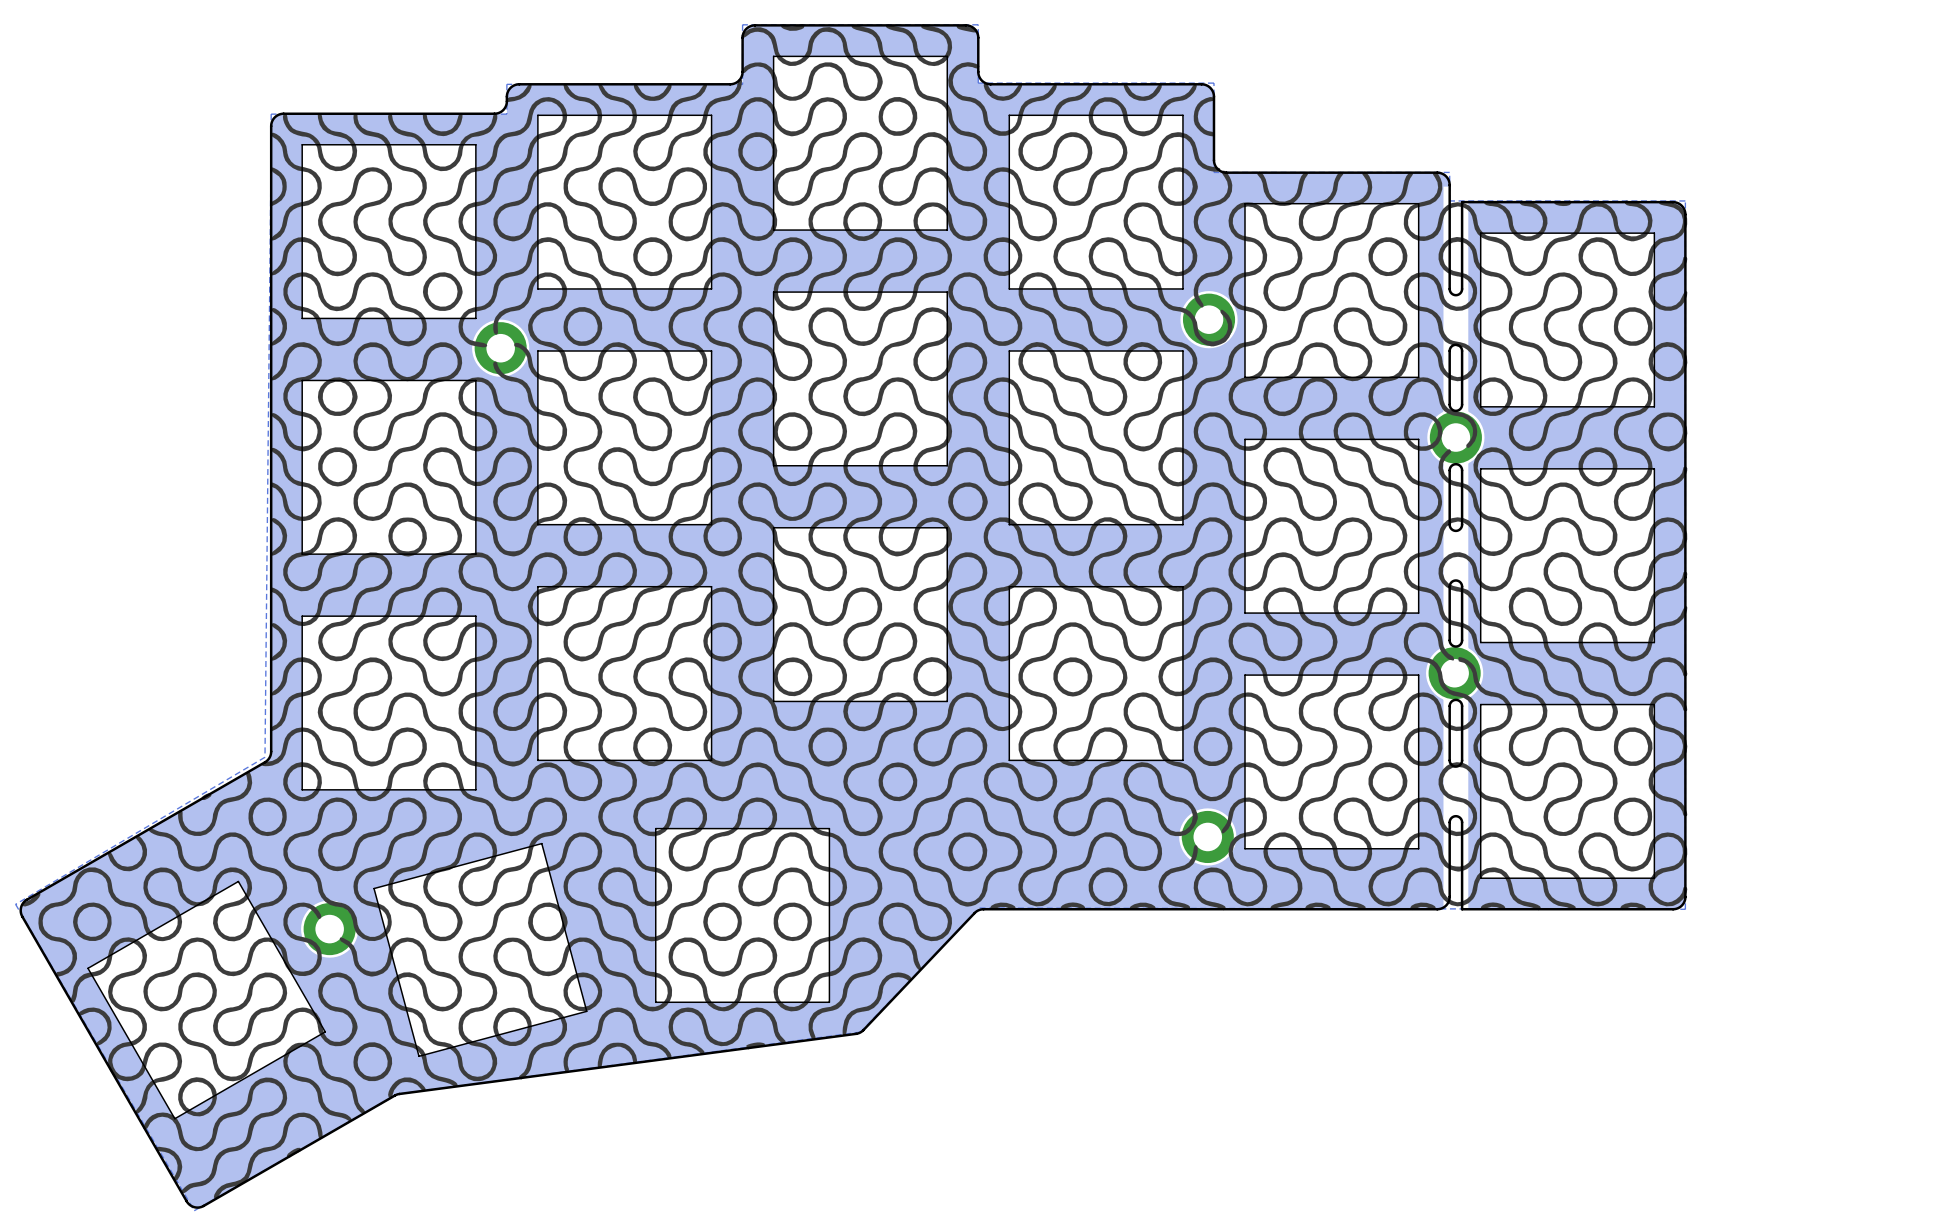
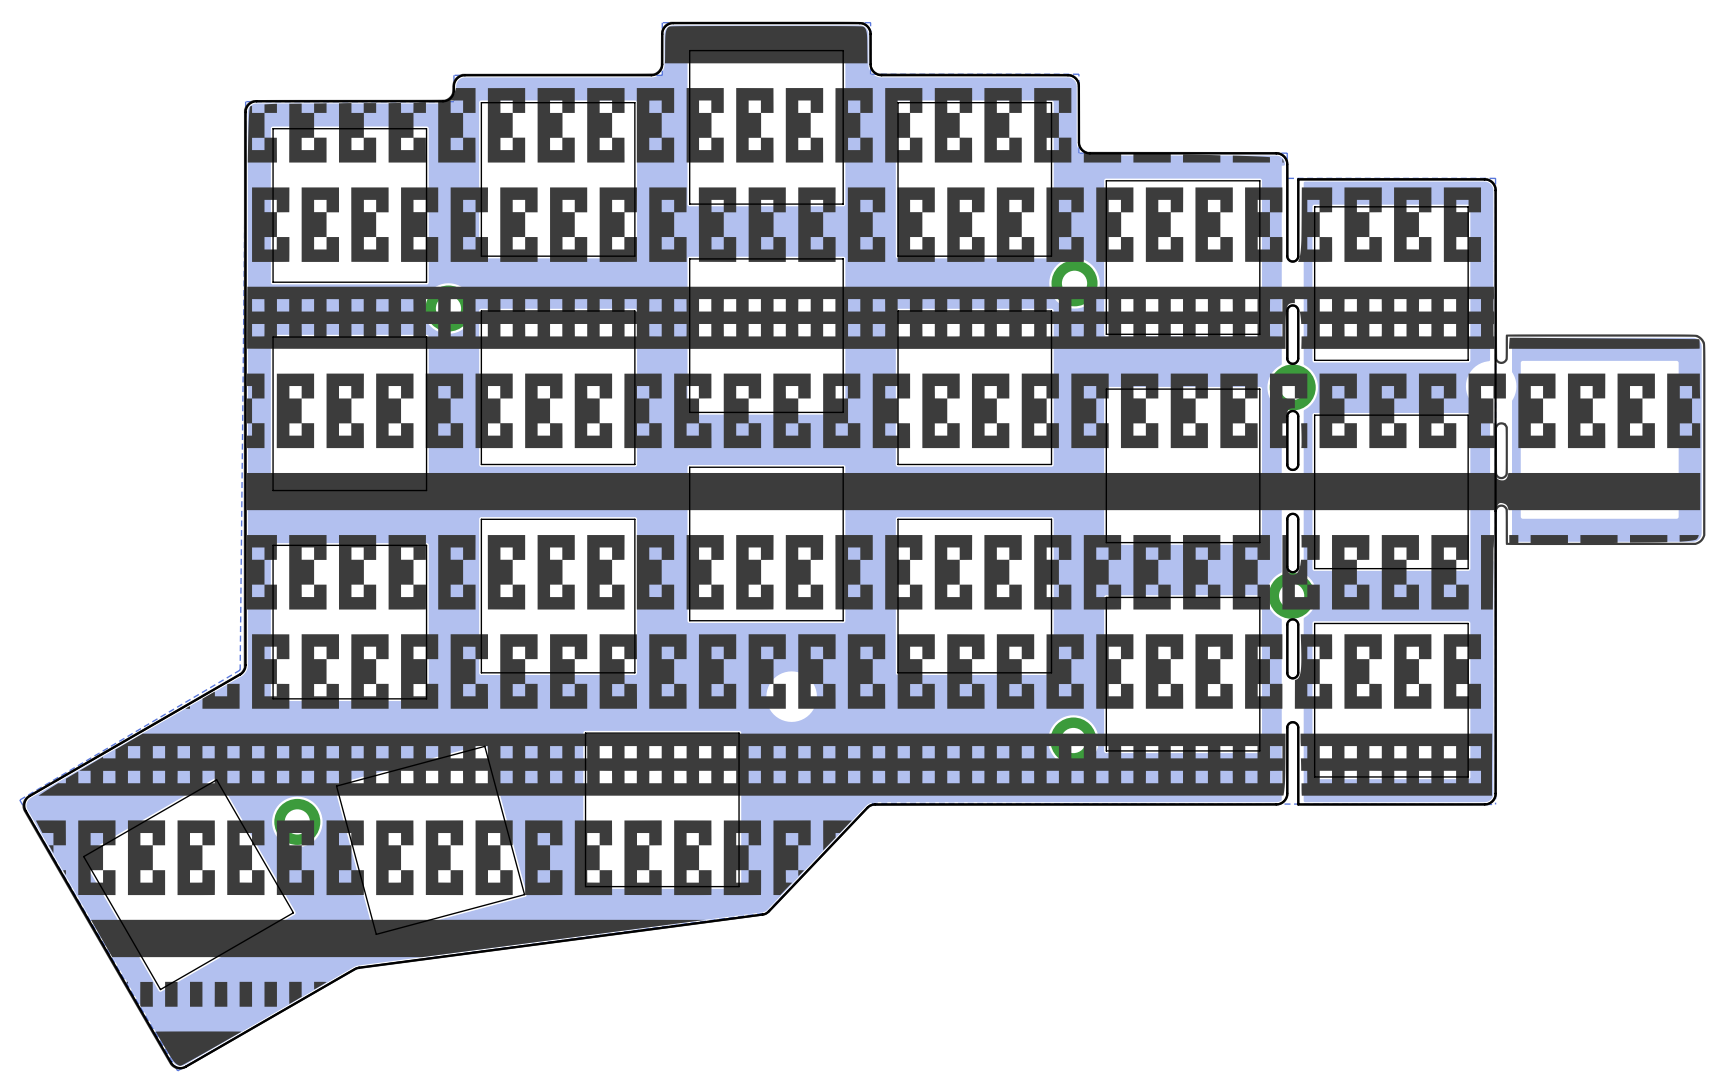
drawing: none -> [22, 21, 1706, 1070]
drawing: [22, 23, 1688, 1200] -> none

